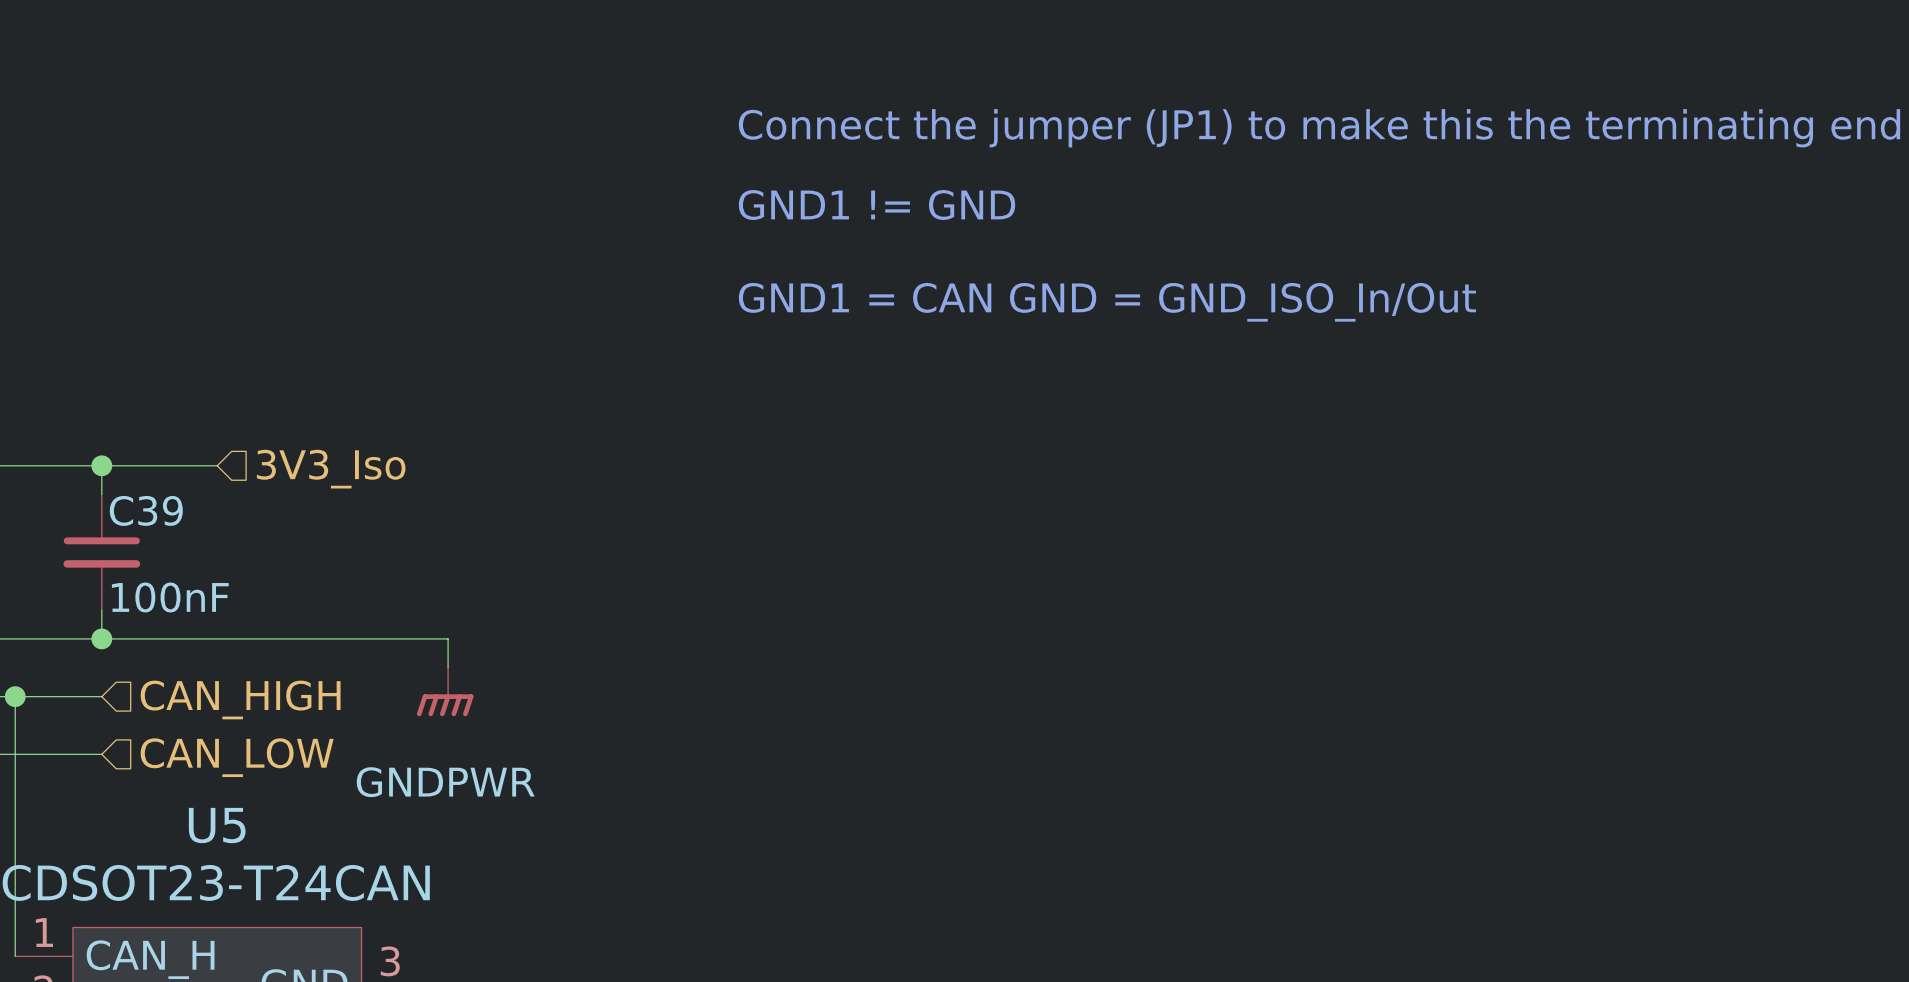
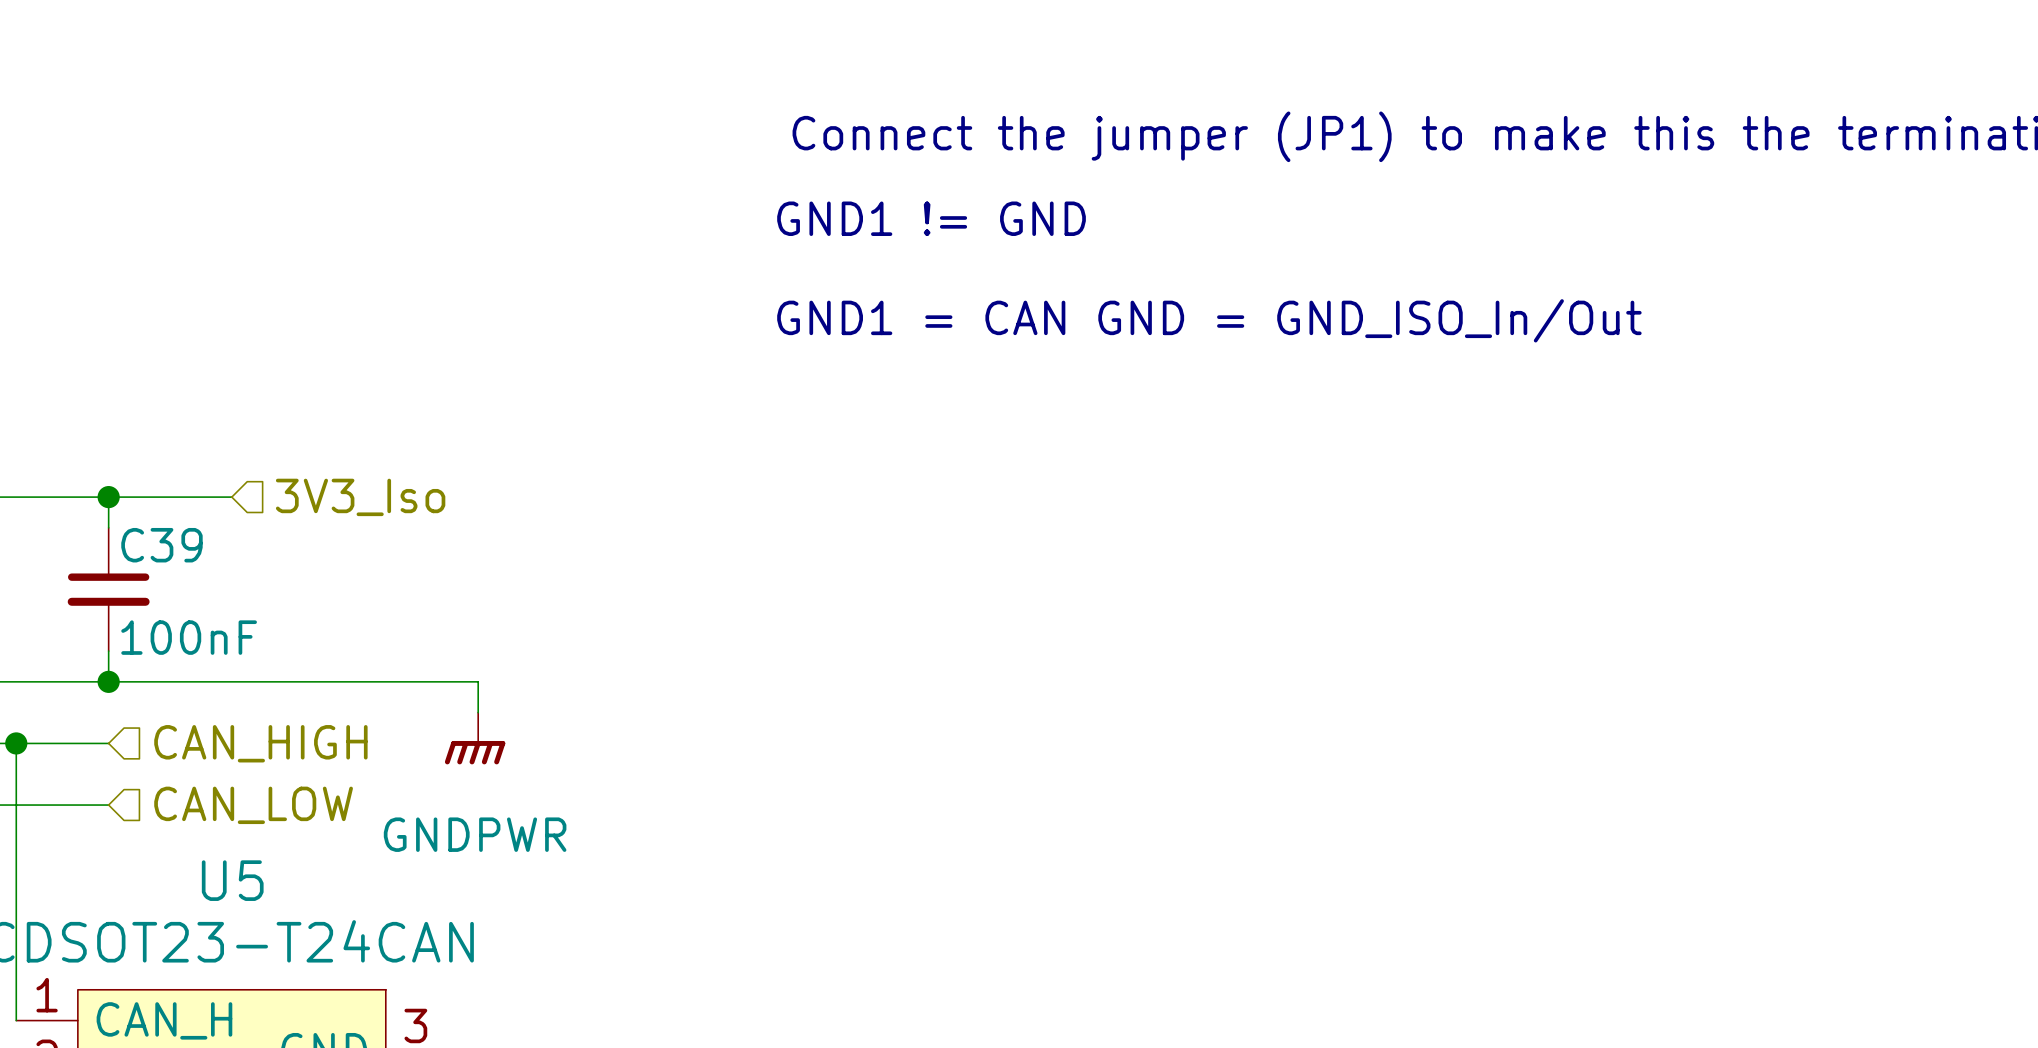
text position: GND1 != GND (877, 204) -> GND1 != GND (931, 218)
text position: GND1 = CAN GND = GND_ISO_In/Out (1107, 302) -> GND1 = CAN GND = GND_ISO_In/Out (1209, 320)

